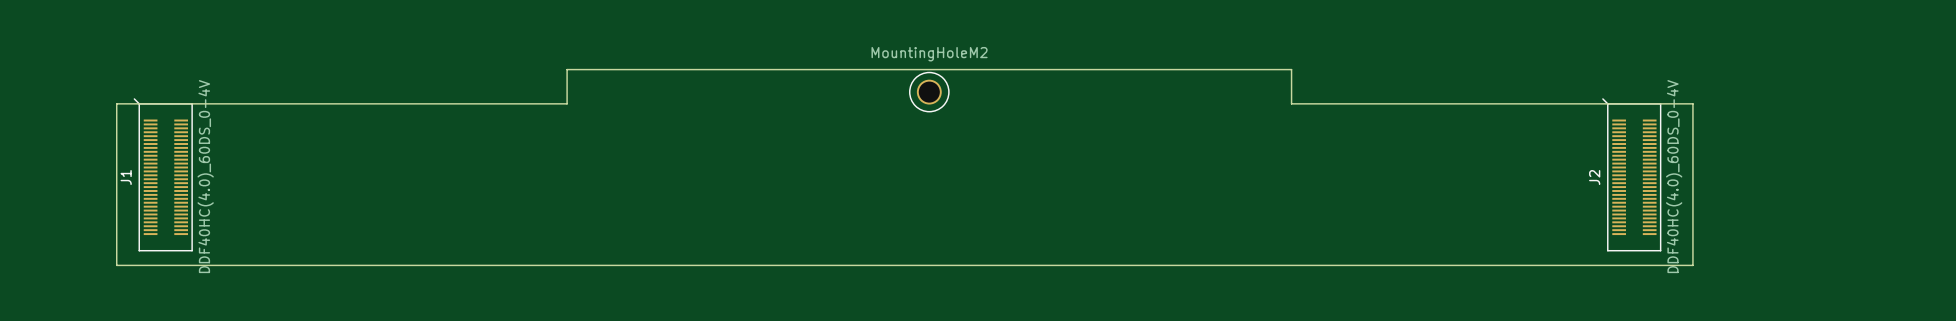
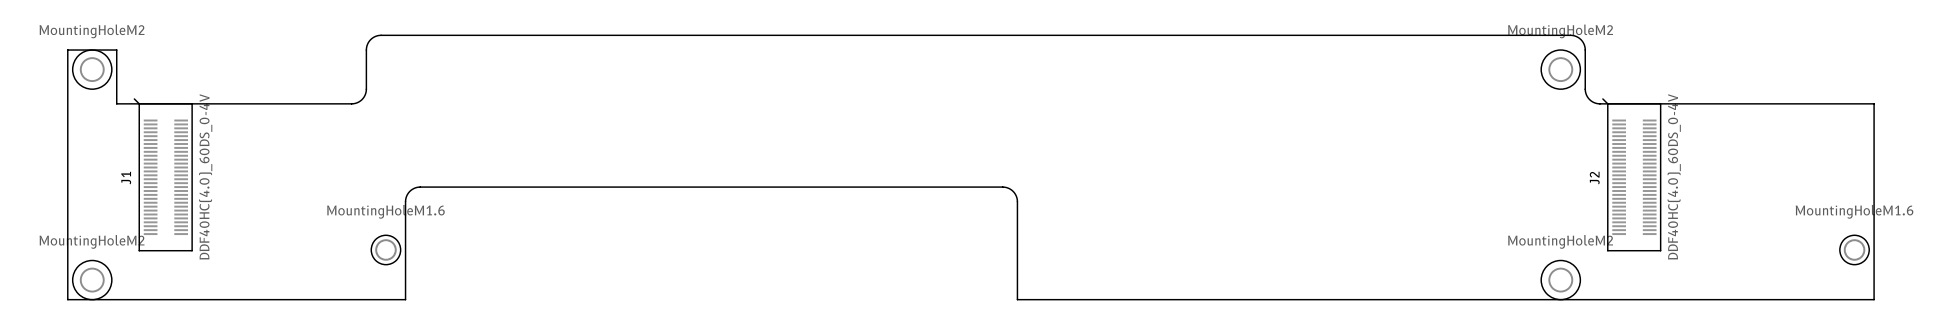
part: none -> MountingHoleM2 (92, 69)
part: none -> MountingHoleM2 (1560, 69)
part: MountingHoleM2 (929, 92) -> none
board edge: (116, 103) (116, 265) (1692, 265) (1692, 103) -> (116, 103) (116, 50) (67, 50) (67, 299) (405, 299) (405, 199) (409, 191) (420, 187) (1004, 187) (1013, 191) (1017, 199) (1017, 299) (1874, 299) (1874, 103) (1692, 103)
board edge: (351, 103) (567, 103) (567, 69) (1291, 69) (1291, 103) (1599, 103) -> (351, 103) (360, 100) (365, 92) (367, 44) (373, 37) (381, 35) (1570, 35) (1577, 37) (1584, 44) (1585, 92) (1591, 100) (1599, 103)
part: none -> MountingHoleM1.6 (385, 249)
part: none -> MountingHoleM1.6 (1854, 249)
part: none -> MountingHoleM2 (92, 280)
part: none -> MountingHoleM2 (1560, 280)

